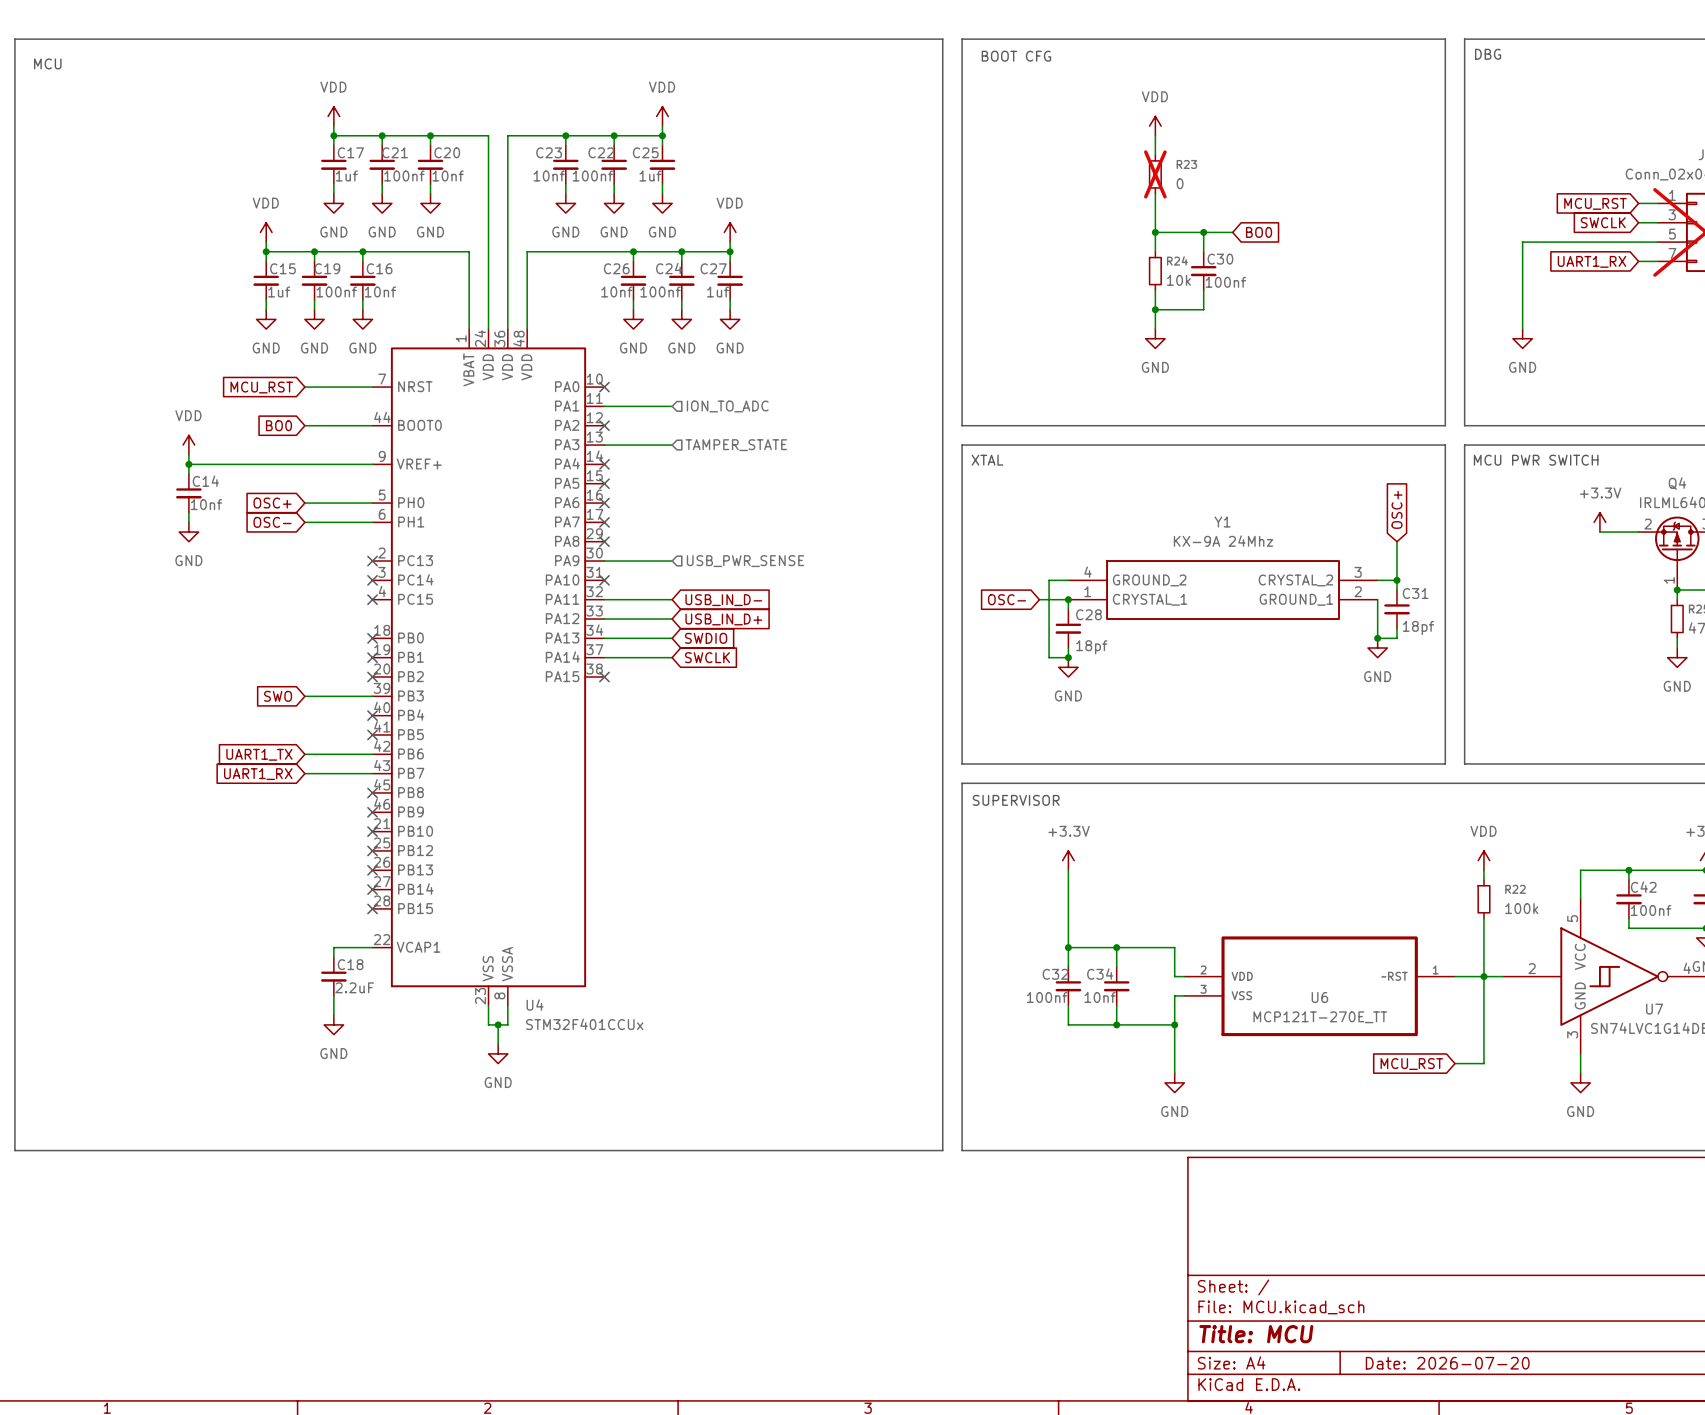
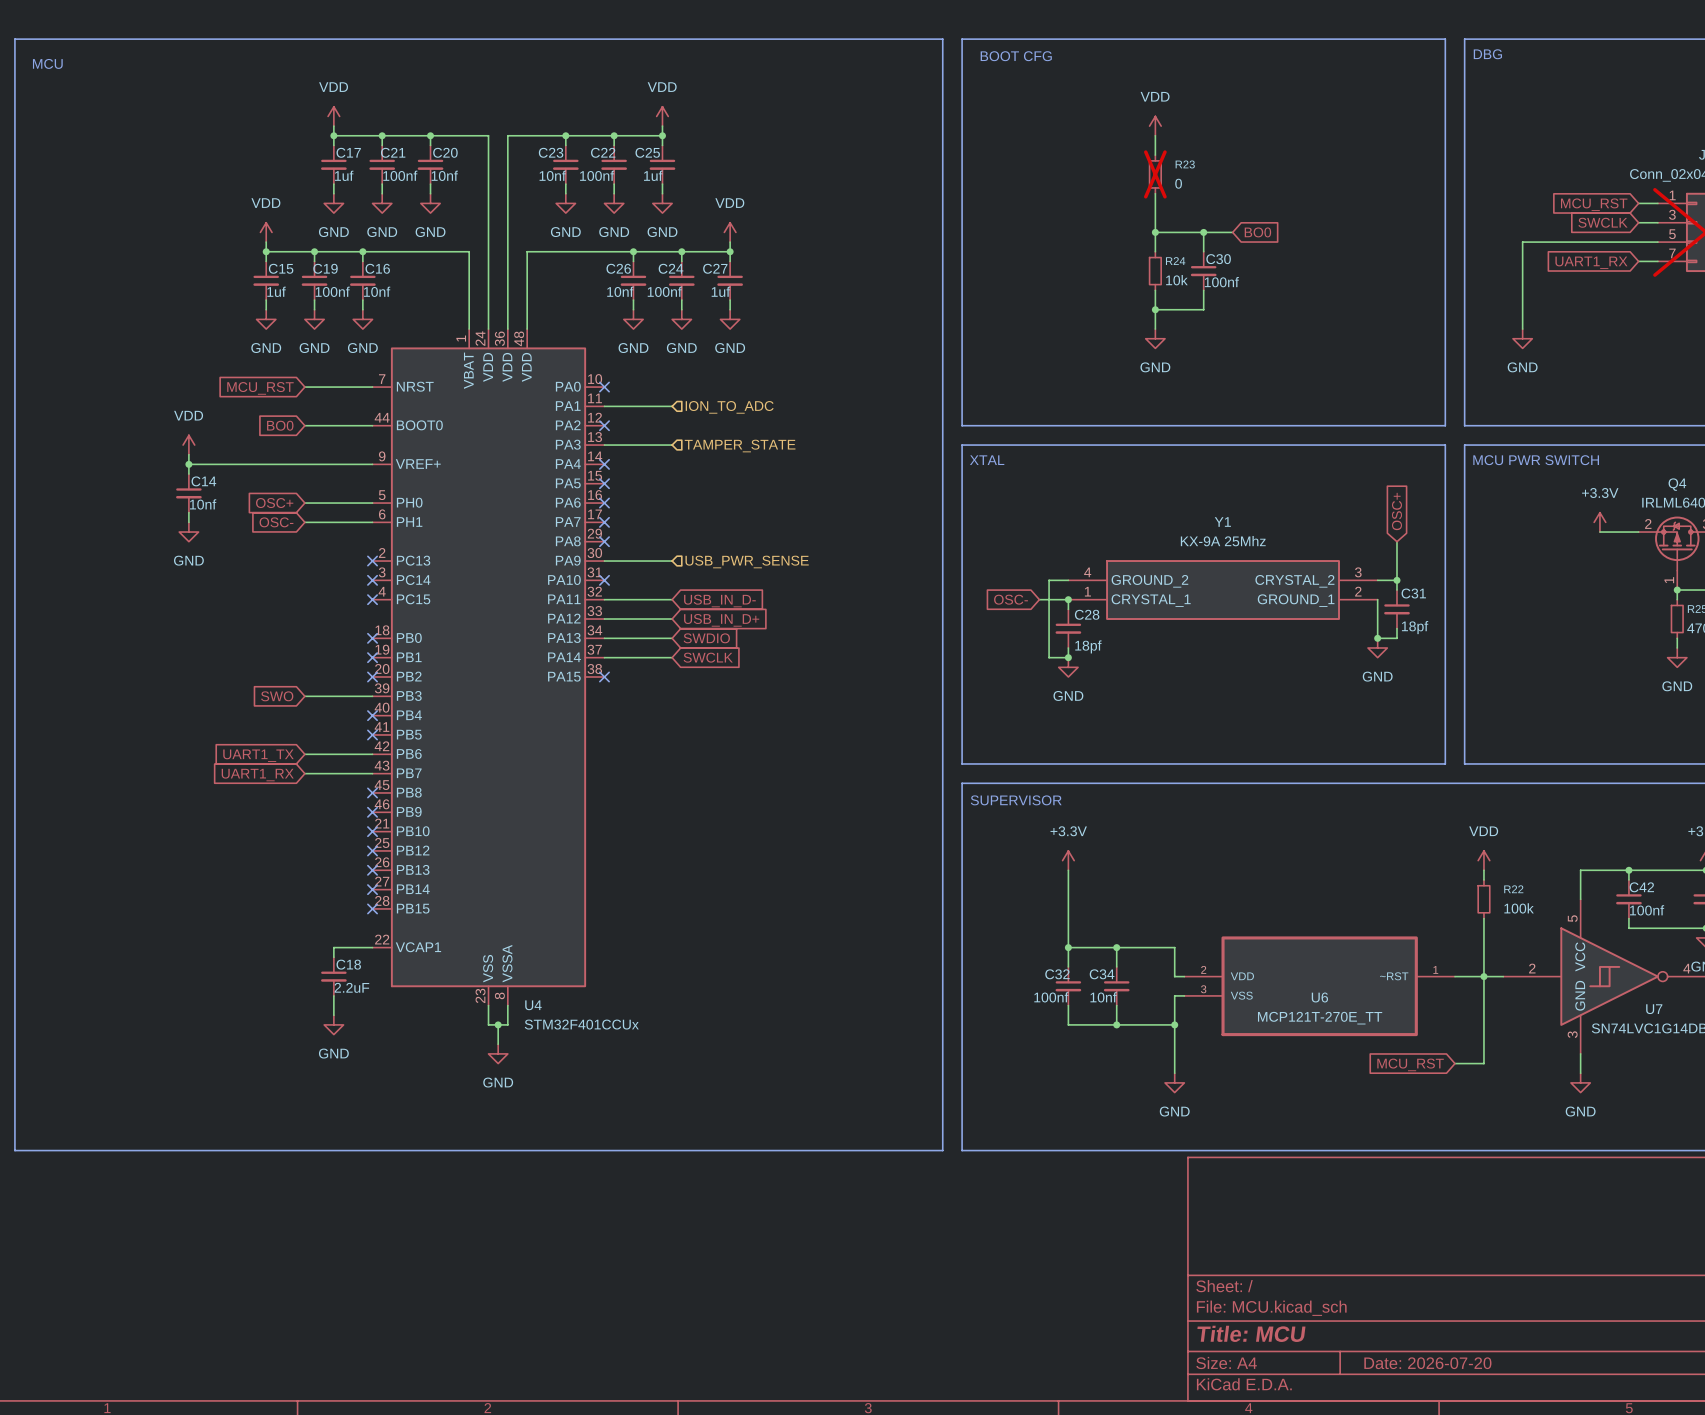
Y1 value: KX-9A 24Mhz (1223, 541) -> KX-9A 25Mhz (1223, 541)

